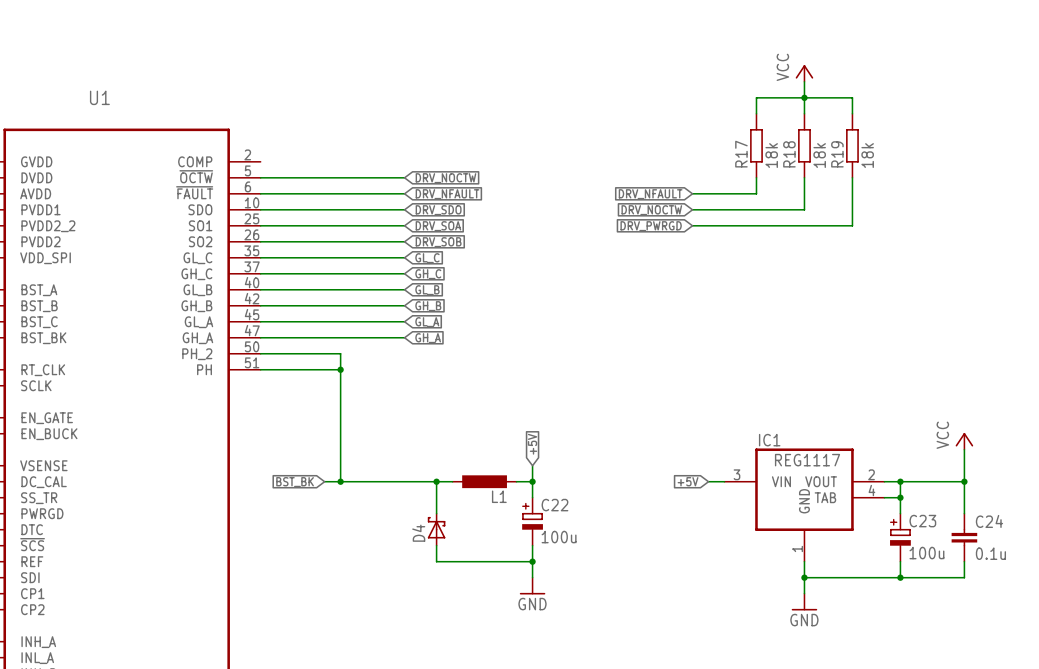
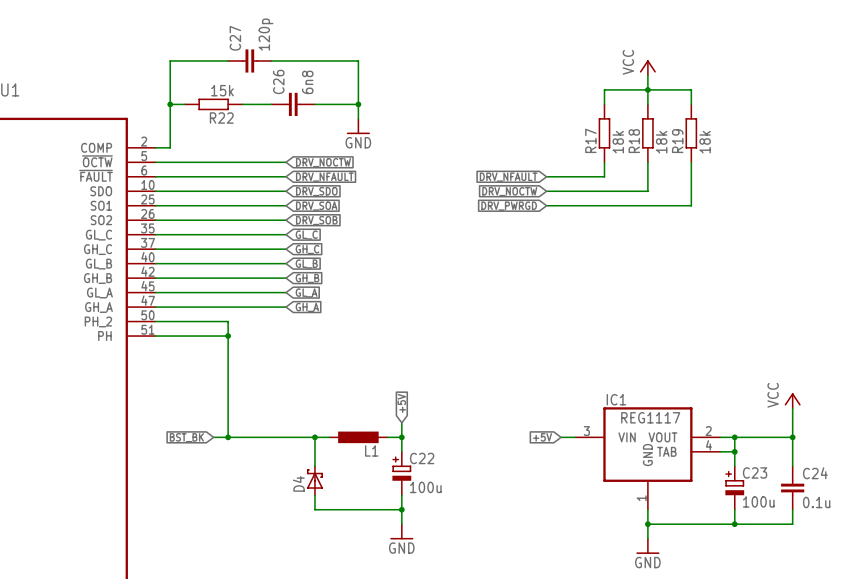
wire: none -> (228, 60) (170, 60) (170, 147) (155, 147)
C27: none -> 120p (249, 60)
wire: none -> (271, 60) (358, 60) (358, 118)
wire: none -> (170, 104) (184, 104)
junction: none -> (170, 104)
R22: none -> 15k (213, 104)
wire: none -> (242, 104) (271, 104)
C26: none -> 6n8 (293, 104)
wire: none -> (314, 104) (358, 104)
junction: none -> (358, 104)
power symbol: none -> GND (358, 126)

